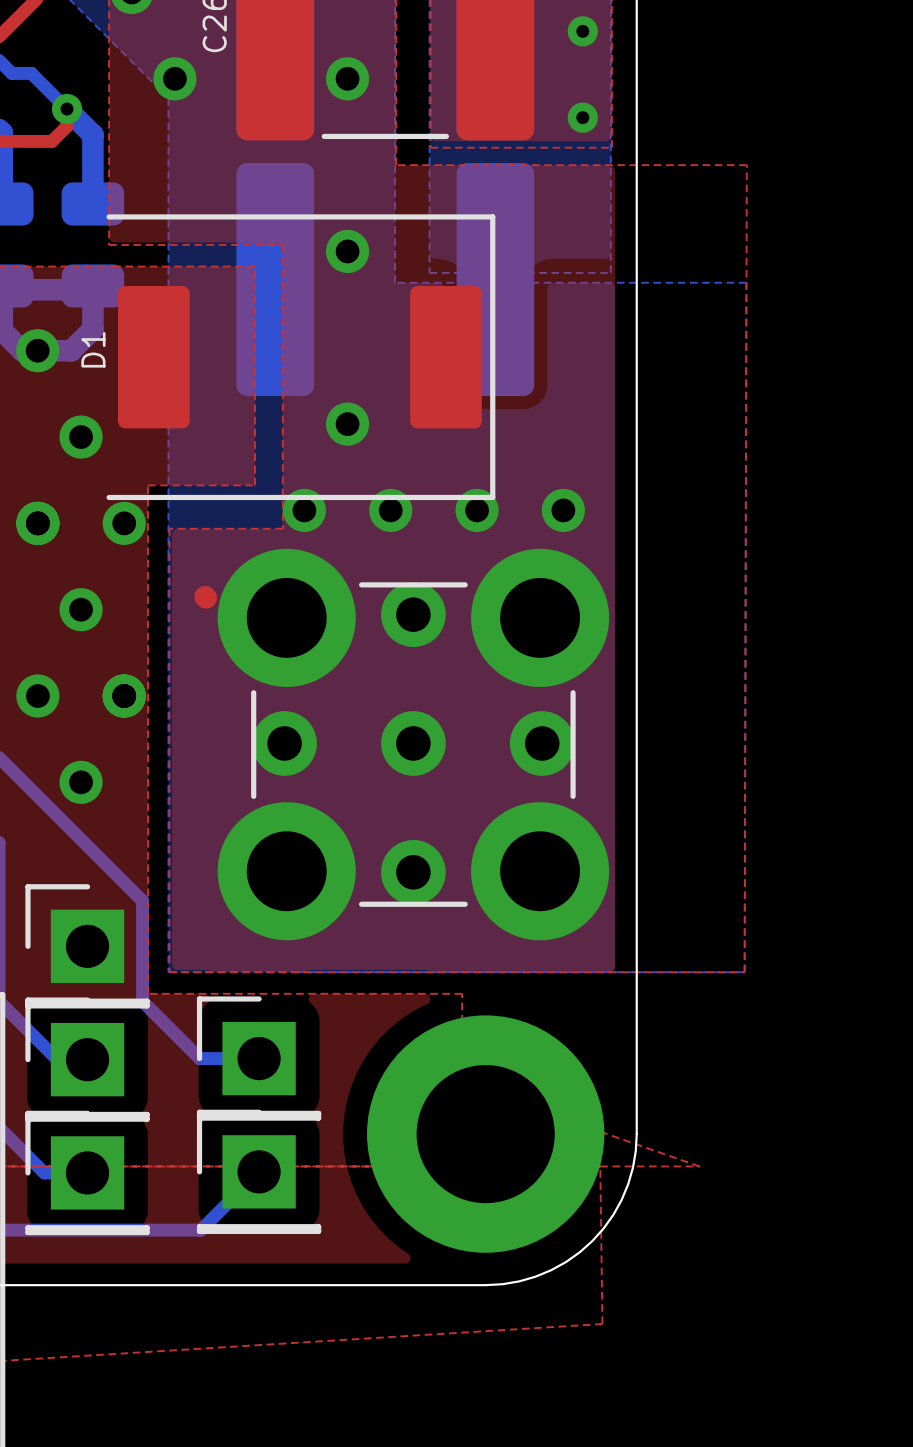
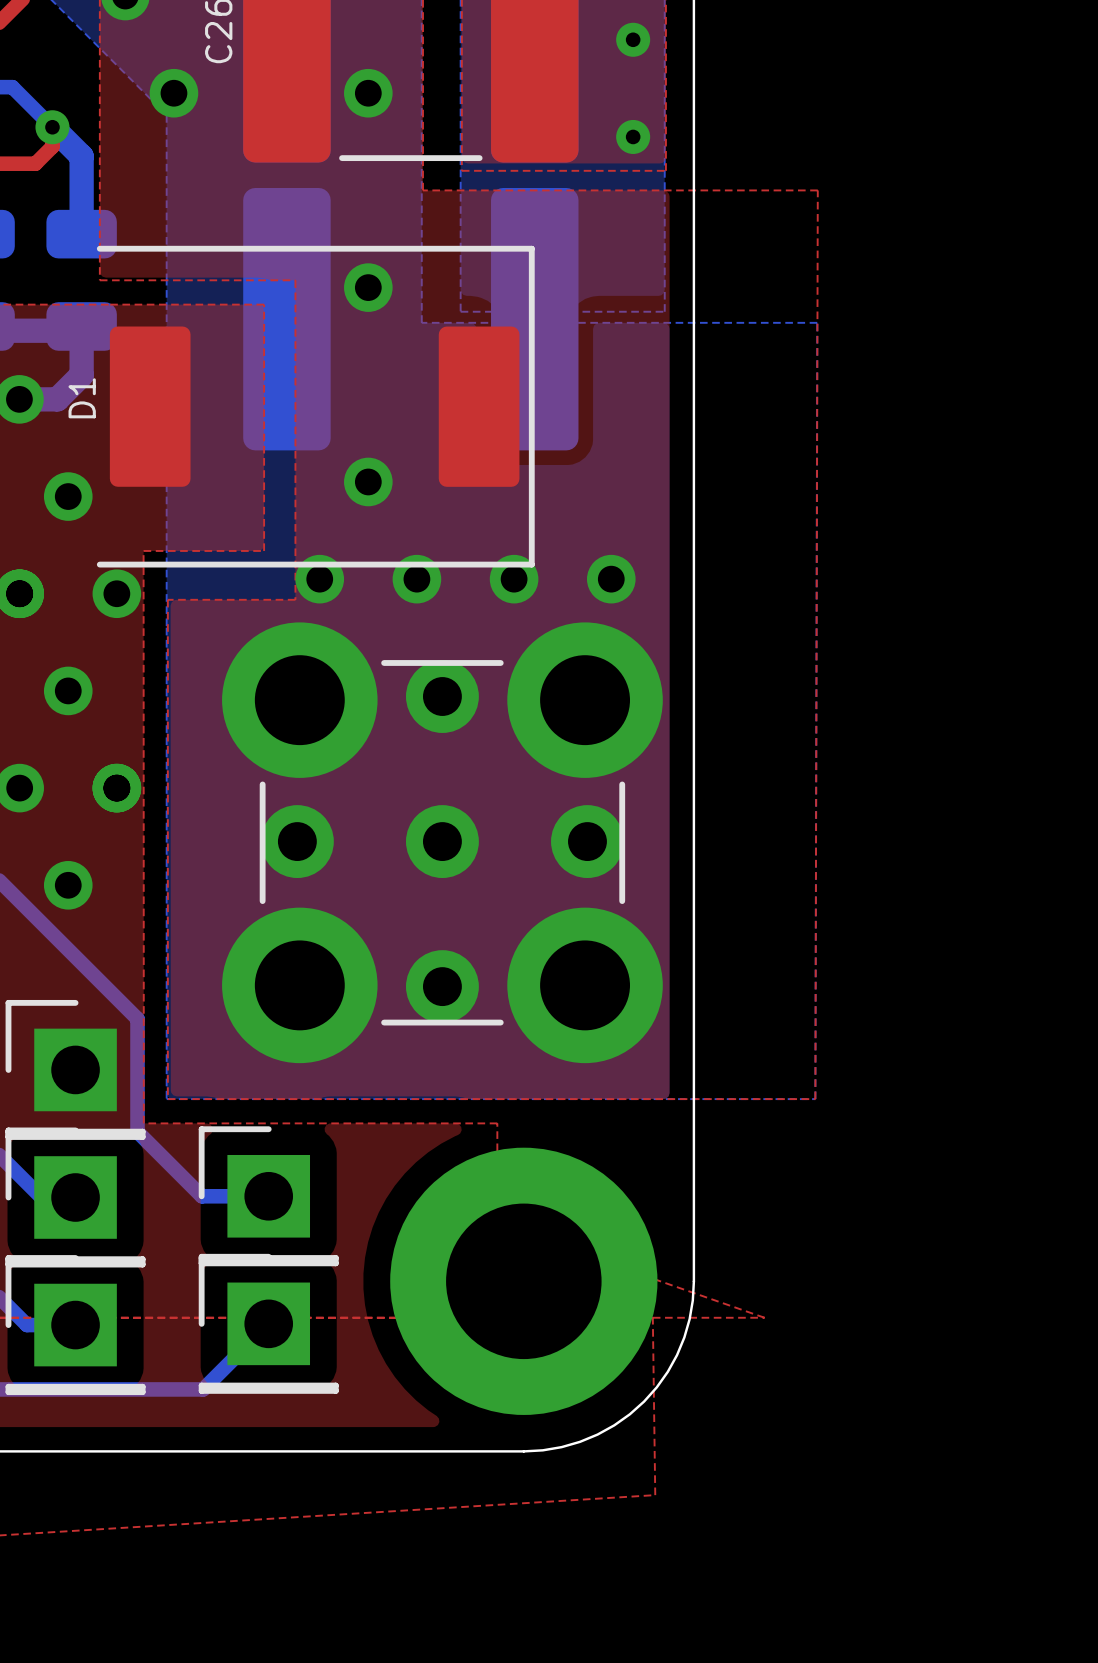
top track: (205, 596) (206, 597) -> none

